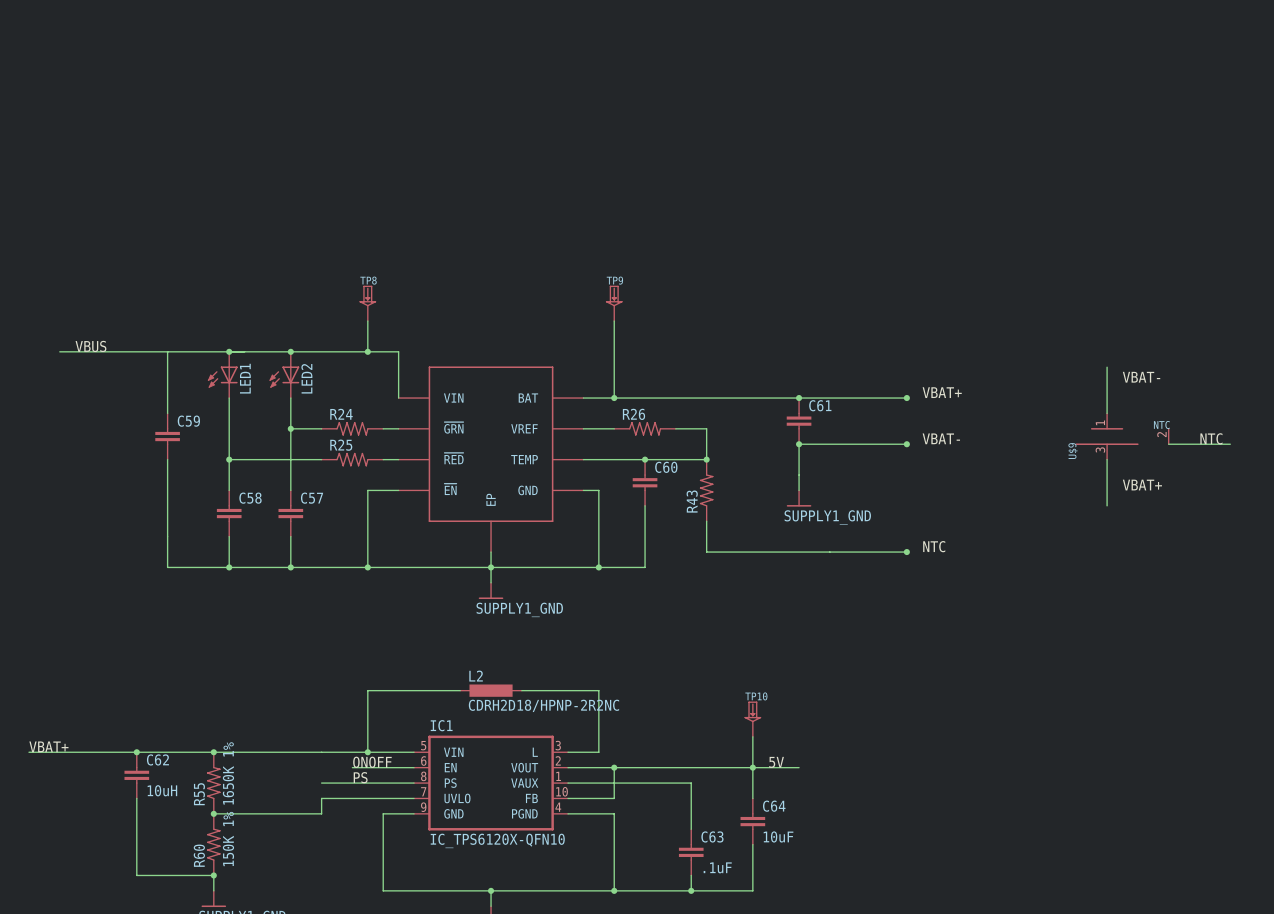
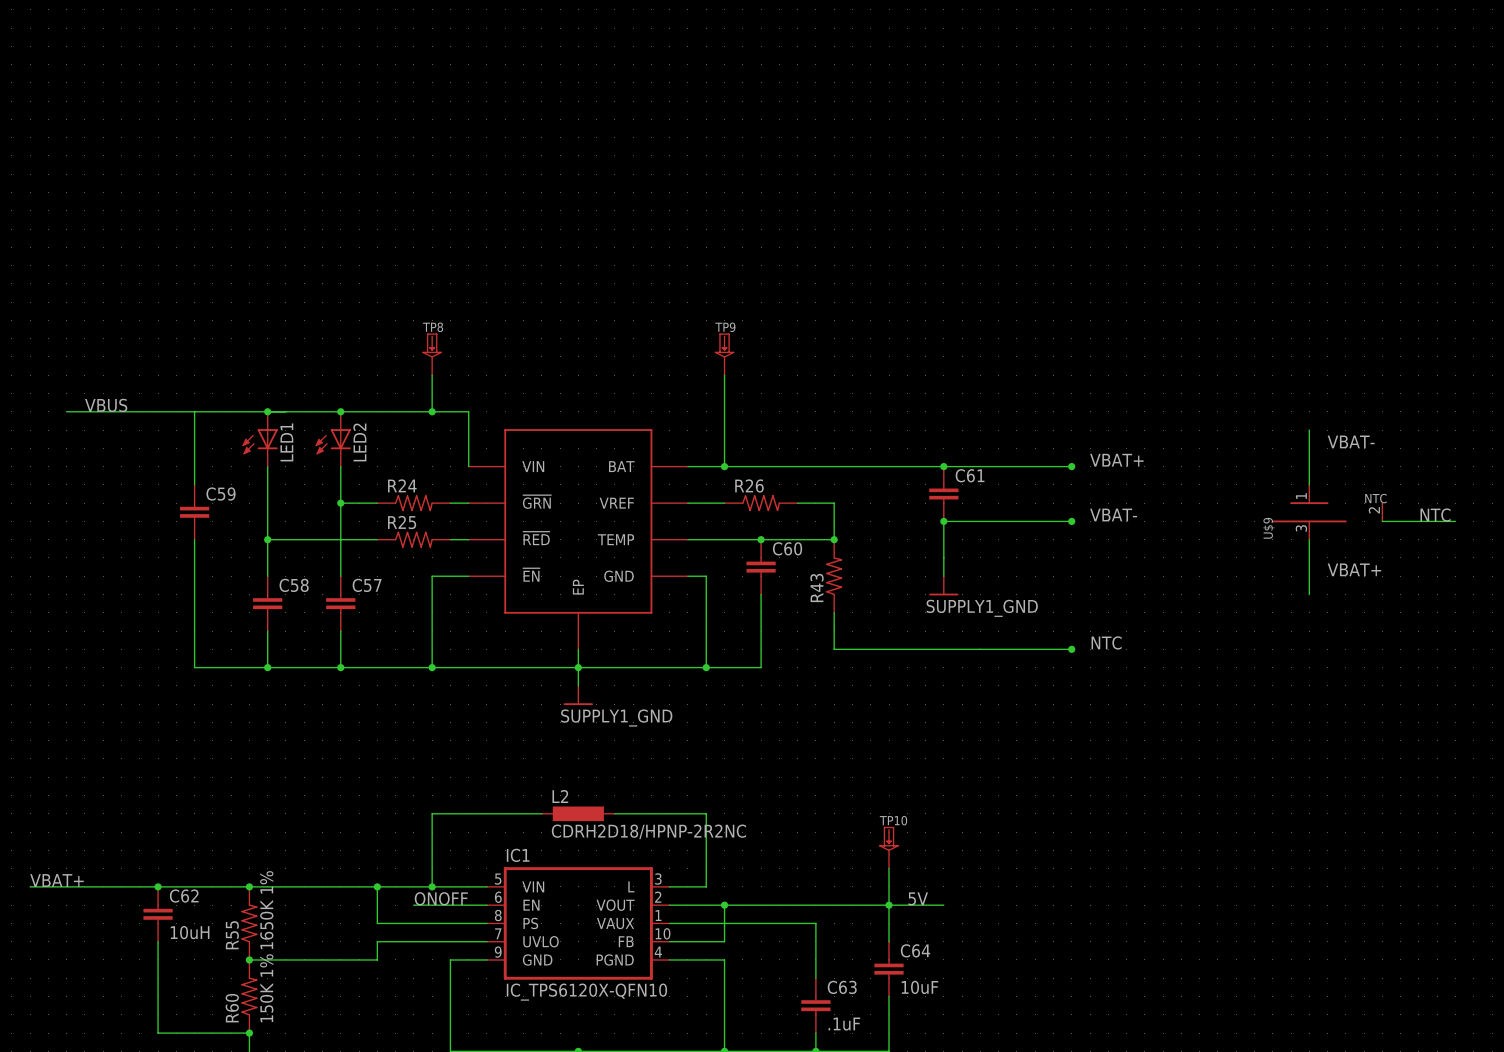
wire: none -> (377, 886) (377, 923)
junction: none -> (377, 886)
label: PS (360, 777) -> none

